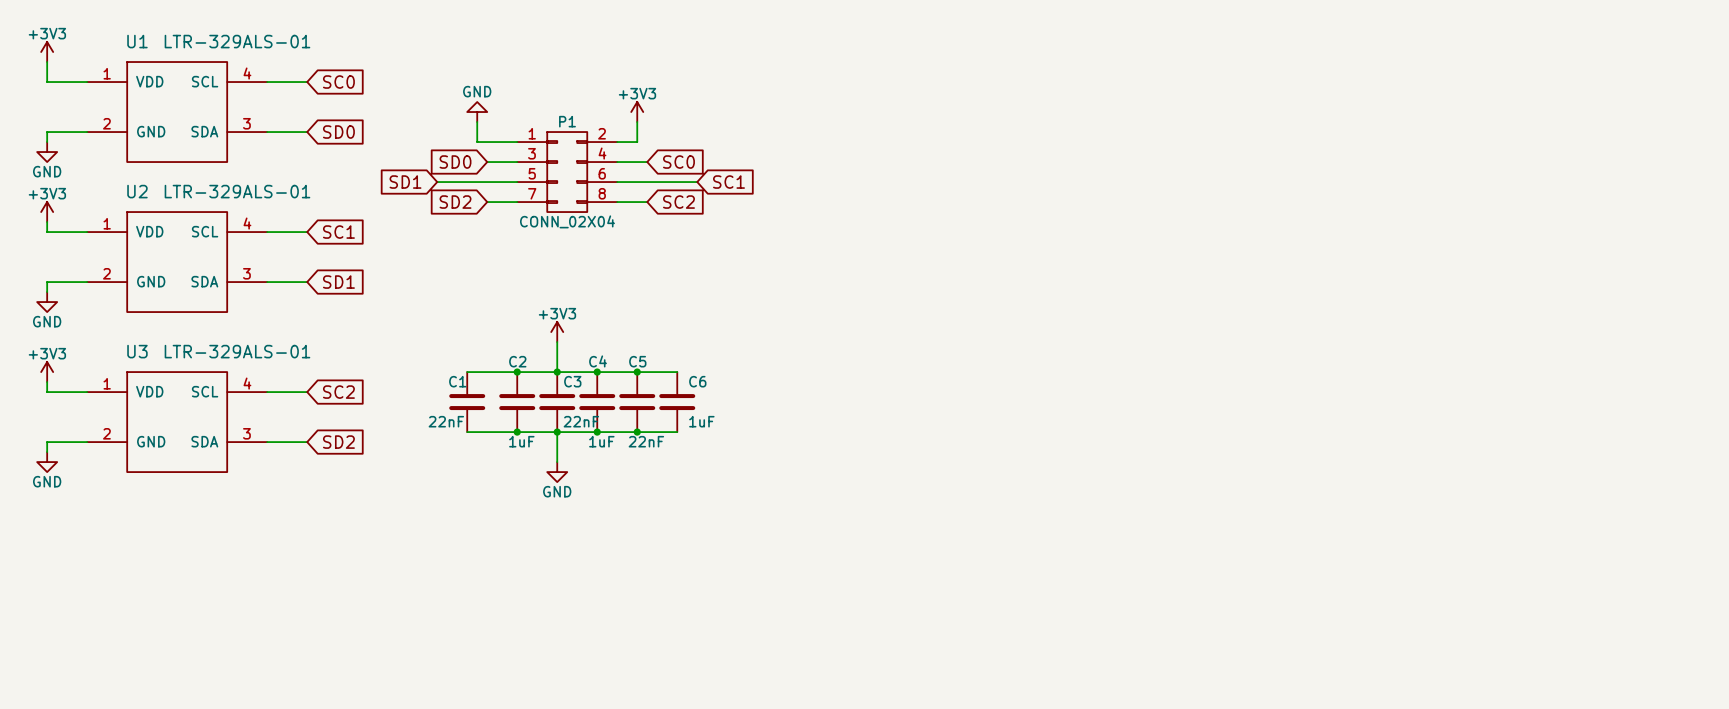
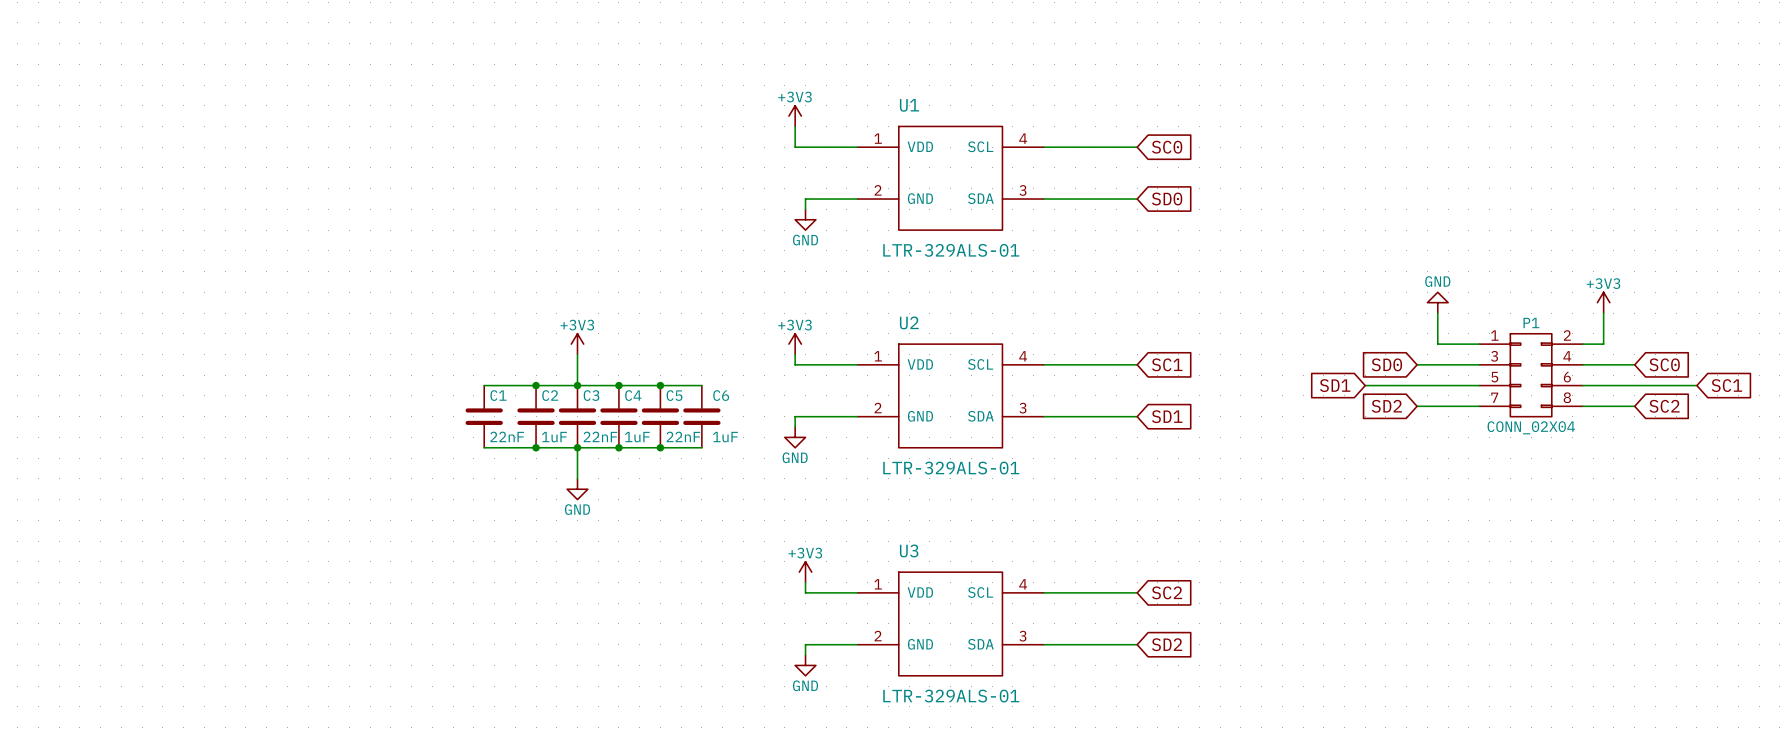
U1 value position: LTR-329ALS-01 (237, 41) -> LTR-329ALS-01 (951, 250)
power symbol: +3V3 (47, 52) -> none
wire: (47, 62) (47, 82) (87, 82) -> none
wire: (267, 82) (307, 82) -> none
global label: SC0 (338, 82) -> none
U1 position: (177, 112) -> (950, 178)
power symbol: GND (477, 112) -> none
power symbol: +3V3 (637, 112) -> none
power symbol: none -> +3V3 (795, 116)
wire: (477, 122) (477, 142) (517, 142) -> none
wire: (637, 122) (637, 142) (617, 142) -> none
wire: none -> (795, 126) (795, 147) (857, 147)
wire: (87, 132) (47, 132) (47, 142) -> none
wire: (267, 132) (307, 132) -> none
global label: SD0 (338, 132) -> none
wire: none -> (1043, 147) (1137, 147)
global label: none -> SC0 (1167, 147)
power symbol: GND (47, 152) -> none
global label: SD0 (455, 162) -> none
wire: (487, 162) (517, 162) -> none
wire: (617, 162) (647, 162) -> none
global label: SC0 (678, 162) -> none
P1 position: (567, 172) -> (1531, 375)
global label: SD1 (405, 182) -> none
wire: (437, 182) (517, 182) -> none
wire: (617, 182) (697, 182) -> none
global label: SC1 (728, 182) -> none
U2 value position: LTR-329ALS-01 (237, 191) -> LTR-329ALS-01 (951, 468)
wire: none -> (857, 199) (805, 199) (805, 209)
wire: none -> (1043, 199) (1137, 199)
global label: none -> SD0 (1167, 199)
global label: SD2 (455, 202) -> none
wire: (487, 202) (517, 202) -> none
wire: (617, 202) (647, 202) -> none
global label: SC2 (678, 202) -> none
power symbol: +3V3 (47, 212) -> none
power symbol: none -> GND (805, 219)
wire: (47, 222) (47, 232) (87, 232) -> none
wire: (267, 232) (307, 232) -> none
global label: SC1 (338, 232) -> none
U2 position: (177, 262) -> (950, 395)
wire: (87, 282) (47, 282) (47, 292) -> none
wire: (267, 282) (307, 282) -> none
global label: SD1 (338, 282) -> none
power symbol: none -> GND (1437, 302)
power symbol: none -> +3V3 (1603, 302)
power symbol: GND (47, 302) -> none
wire: none -> (1437, 313) (1437, 344) (1479, 344)
wire: none -> (1603, 313) (1603, 344) (1582, 344)
power symbol: none -> +3V3 (795, 344)
wire: none -> (795, 354) (795, 364) (857, 364)
U3 value position: LTR-329ALS-01 (237, 351) -> LTR-329ALS-01 (951, 696)
wire: none -> (1043, 364) (1137, 364)
global label: none -> SC1 (1167, 364)
global label: none -> SD0 (1386, 364)
wire: none -> (1417, 364) (1479, 364)
wire: none -> (1582, 364) (1634, 364)
global label: none -> SC0 (1664, 364)
C2 name position: C2 (517, 361) -> C2 (550, 395)
C4 name position: C4 (598, 361) -> C4 (633, 395)
C5 name position: C5 (637, 361) -> C5 (674, 395)
power symbol: +3V3 (47, 372) -> none
global label: none -> SD1 (1335, 385)
wire: none -> (1365, 385) (1479, 385)
wire: none -> (1582, 385) (1696, 385)
global label: none -> SC1 (1726, 385)
C1 name position: C1 (457, 381) -> C1 (498, 395)
wire: (47, 382) (47, 392) (87, 392) -> none
wire: (267, 392) (307, 392) -> none
global label: SC2 (338, 392) -> none
global label: none -> SD2 (1386, 406)
wire: none -> (1417, 406) (1479, 406)
wire: none -> (1582, 406) (1634, 406)
global label: none -> SC2 (1664, 406)
wire: none -> (857, 416) (795, 416) (795, 427)
wire: none -> (1043, 416) (1137, 416)
global label: none -> SD1 (1167, 416)
C1 value position: 22nF (446, 421) -> 22nF (507, 436)
U3 position: (177, 422) -> (950, 623)
power symbol: none -> GND (795, 437)
C2 value position: 1uF (521, 441) -> 1uF (554, 437)
C4 value position: 1uF (601, 441) -> 1uF (637, 437)
C5 value position: 22nF (646, 441) -> 22nF (683, 436)
wire: (87, 442) (47, 442) (47, 452) -> none
wire: (267, 442) (307, 442) -> none
global label: SD2 (338, 442) -> none
power symbol: GND (47, 462) -> none
power symbol: none -> +3V3 (805, 572)
wire: none -> (805, 582) (805, 592) (857, 592)
wire: none -> (1043, 592) (1137, 592)
global label: none -> SC2 (1167, 592)
wire: none -> (857, 644) (805, 644) (805, 655)
wire: none -> (1043, 644) (1137, 644)
global label: none -> SD2 (1167, 644)
power symbol: none -> GND (805, 665)

